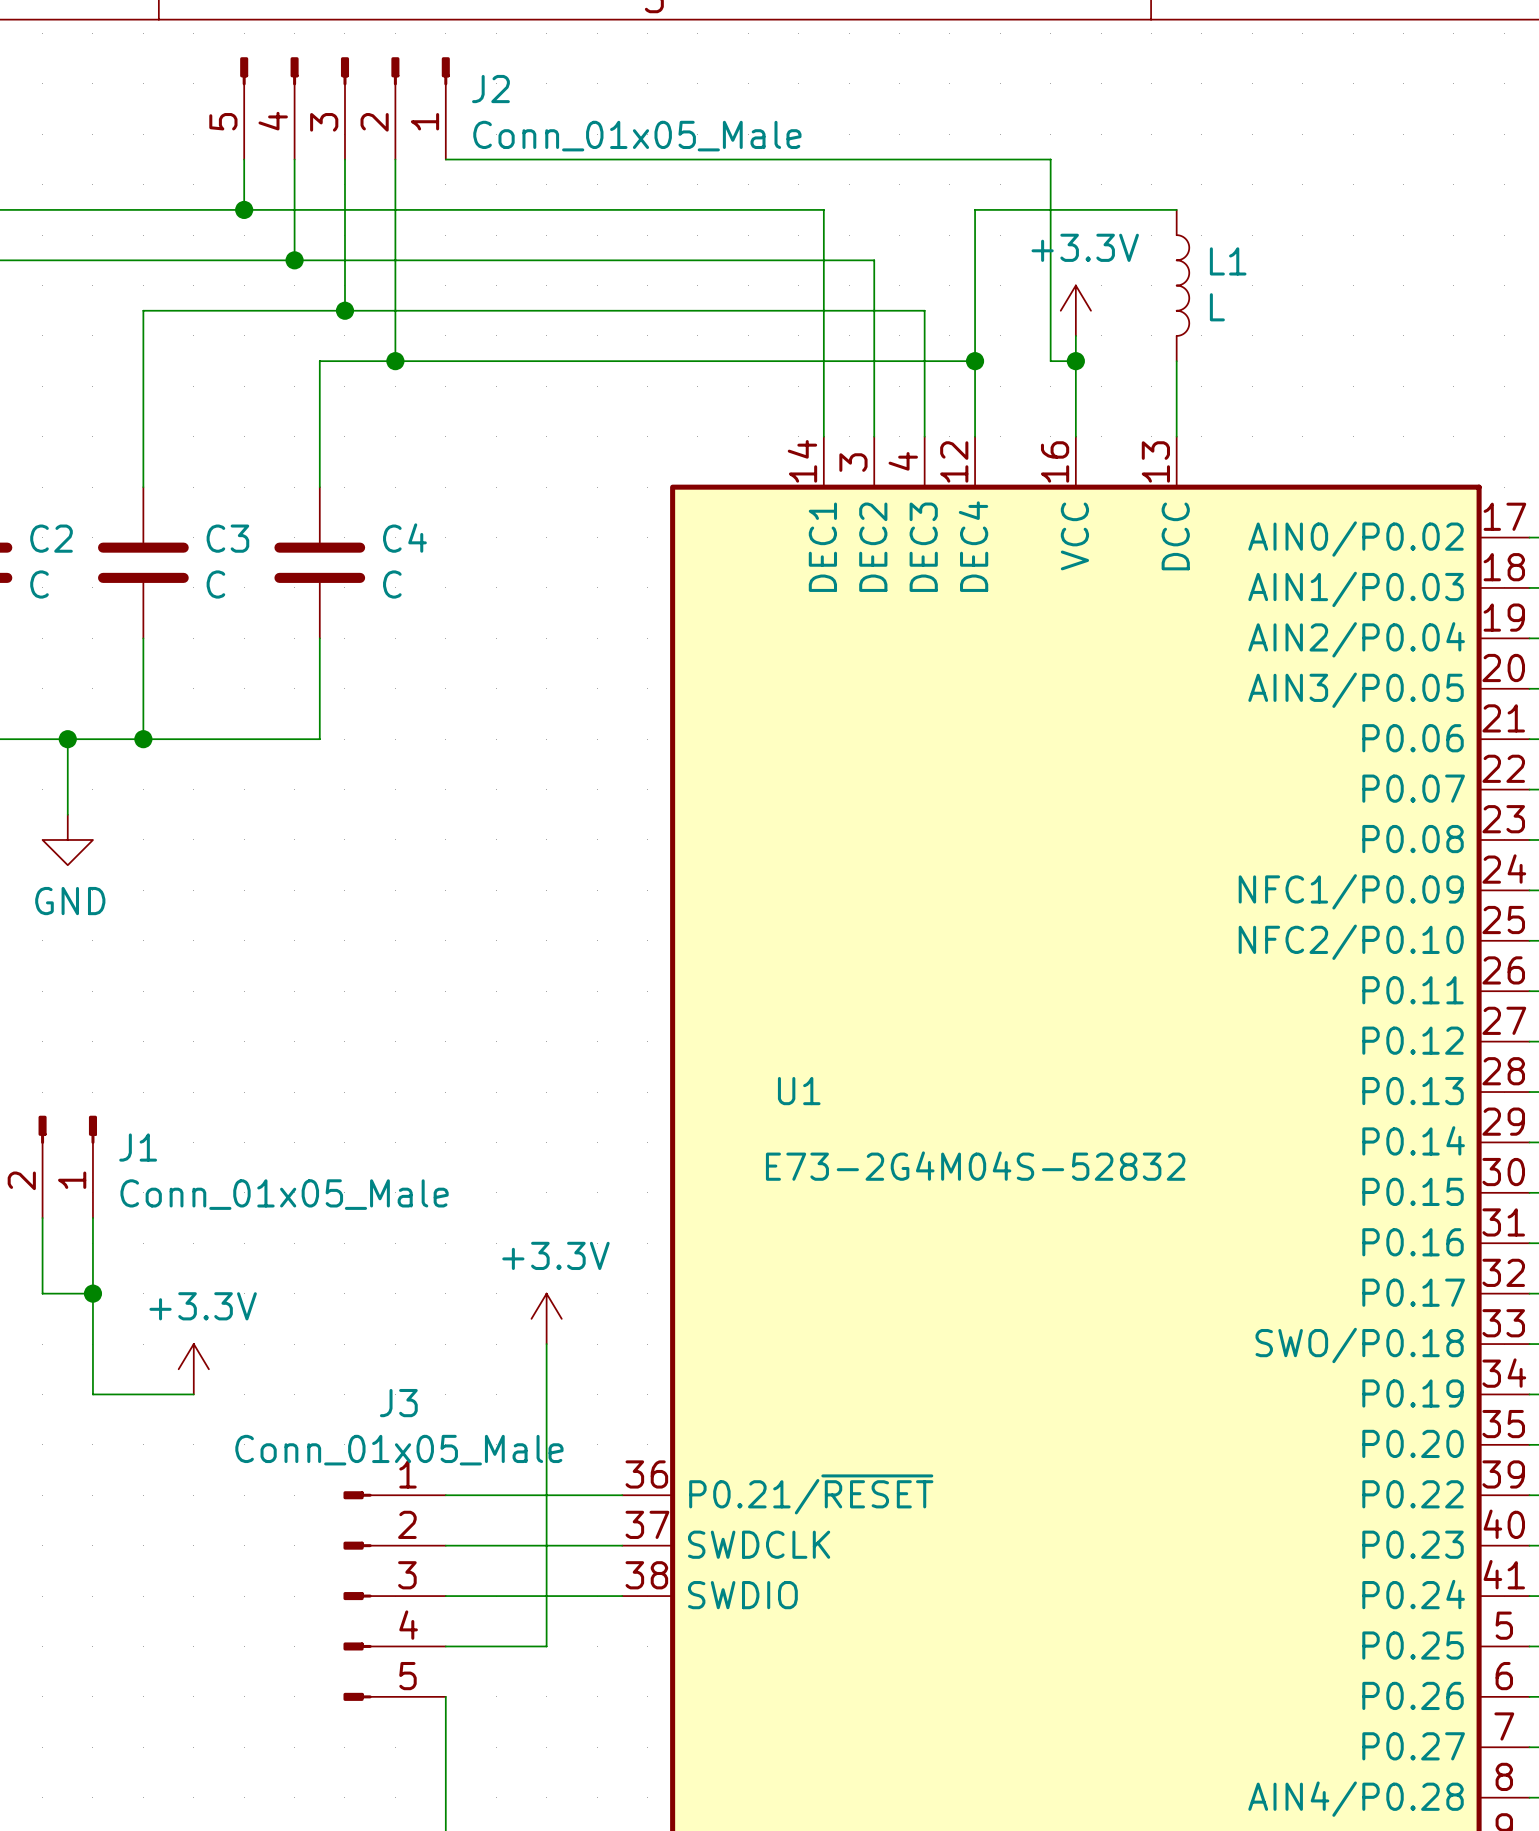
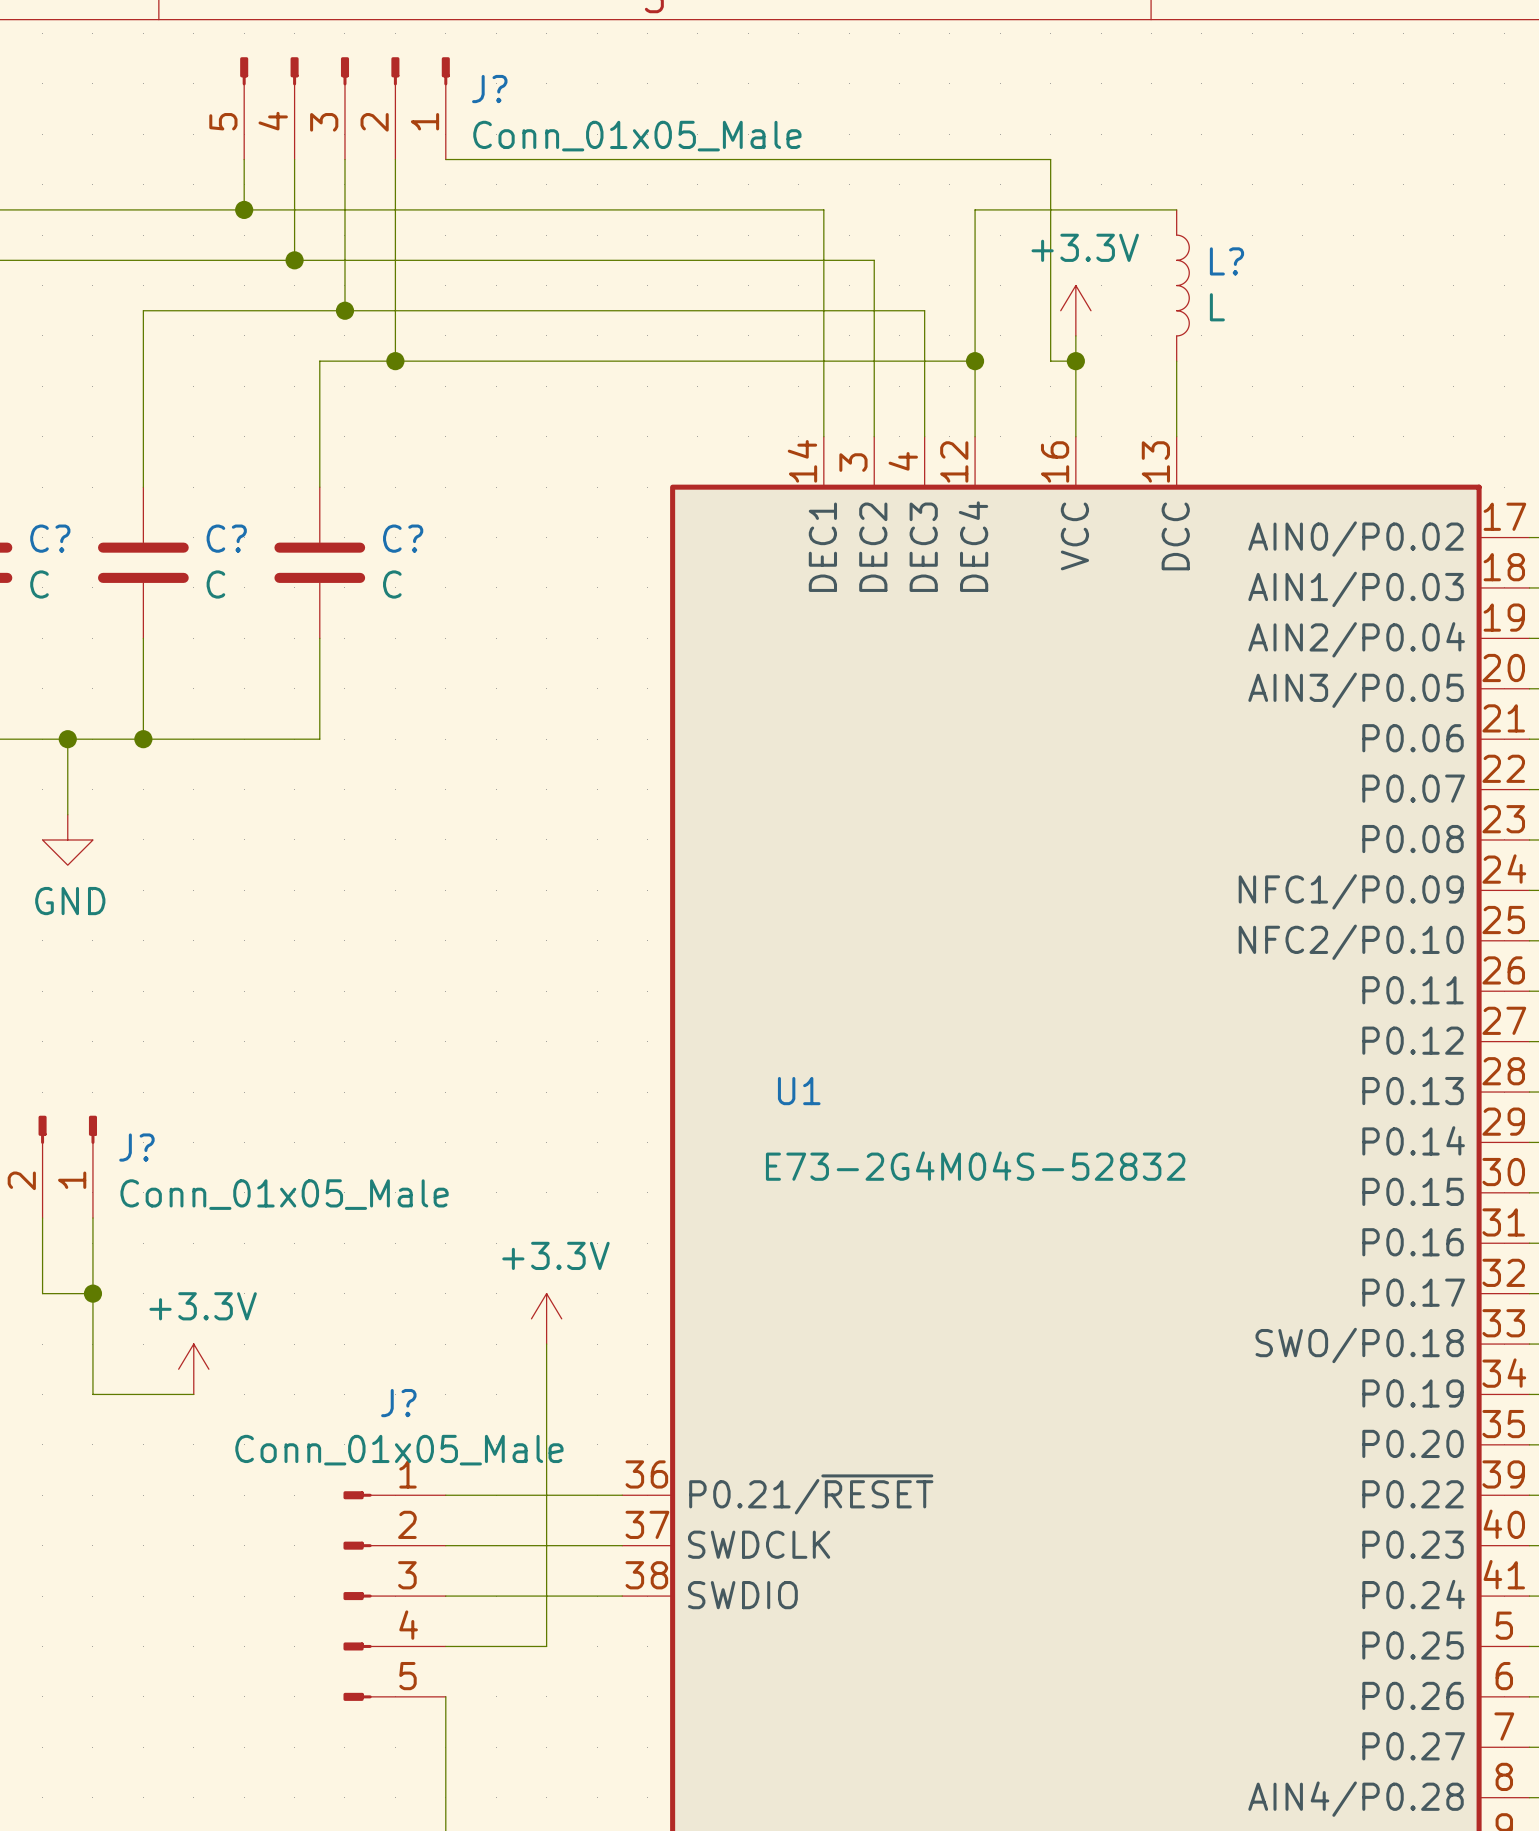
J2 name: J2 (490, 89) -> J? (489, 89)
L1 name: L1 (1228, 261) -> L? (1226, 261)
C2 name: C2 (51, 538) -> C? (50, 538)
C3 name: C3 (227, 538) -> C? (226, 538)
C4 name: C4 (404, 538) -> C? (403, 538)
J1 name: J1 (138, 1147) -> J? (136, 1147)
J3 name: J3 (398, 1403) -> J? (398, 1403)

